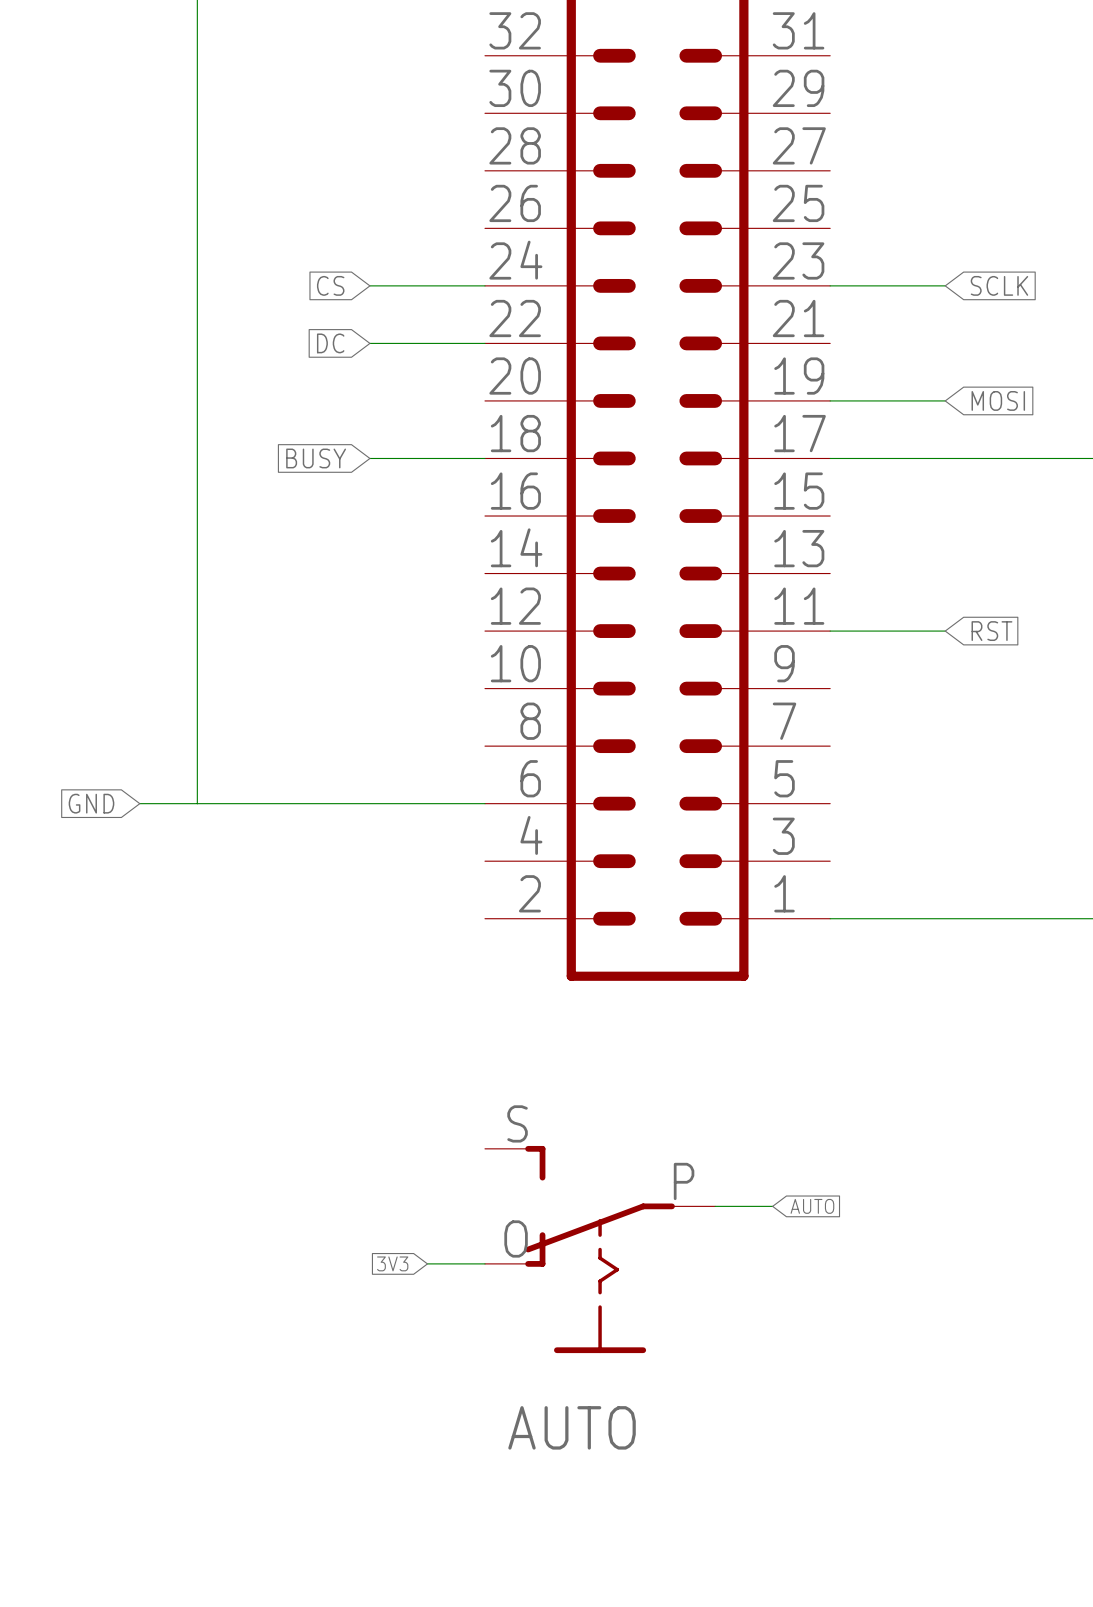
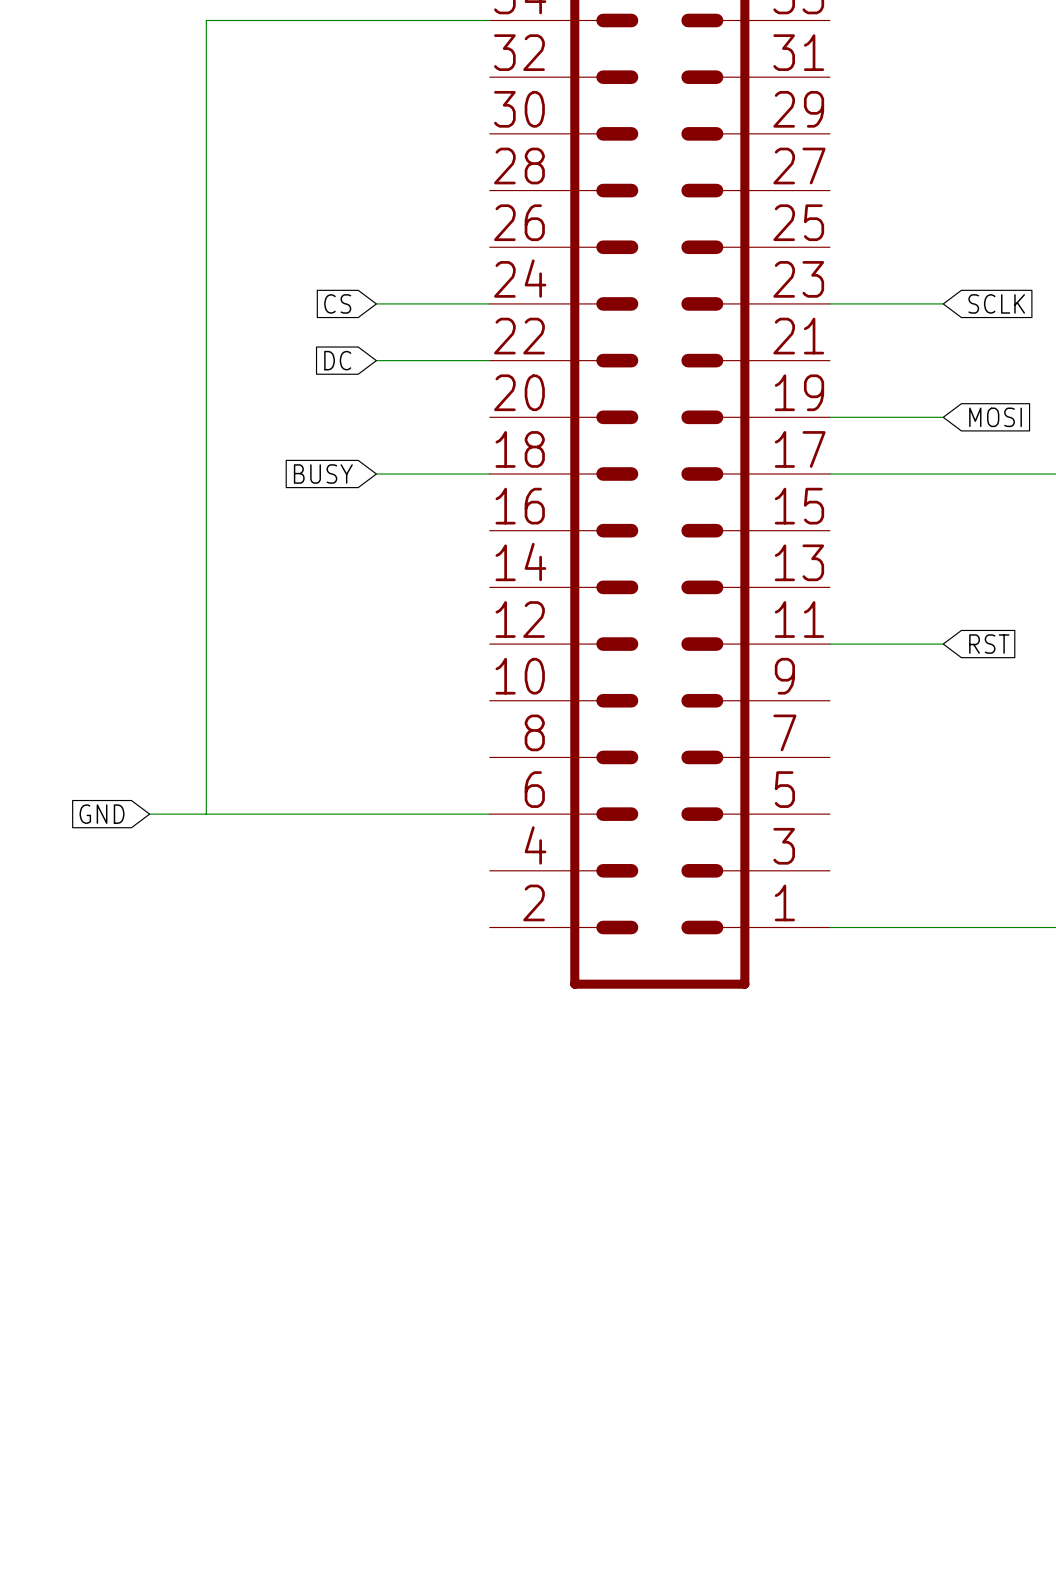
wire: (715, 1206) (772, 1206) -> none
global label: AUTO (812, 1206) -> none
AUTO: (600, 1249) -> none
global label: 3V3 (392, 1263) -> none
wire: (427, 1263) (484, 1263) -> none

